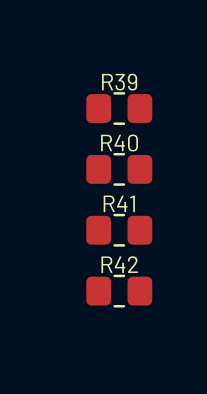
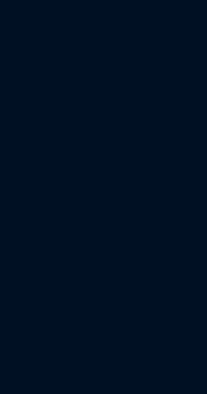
R39: (119, 108) -> none
R40: (119, 169) -> none
R41: (119, 230) -> none
R42: (119, 291) -> none

